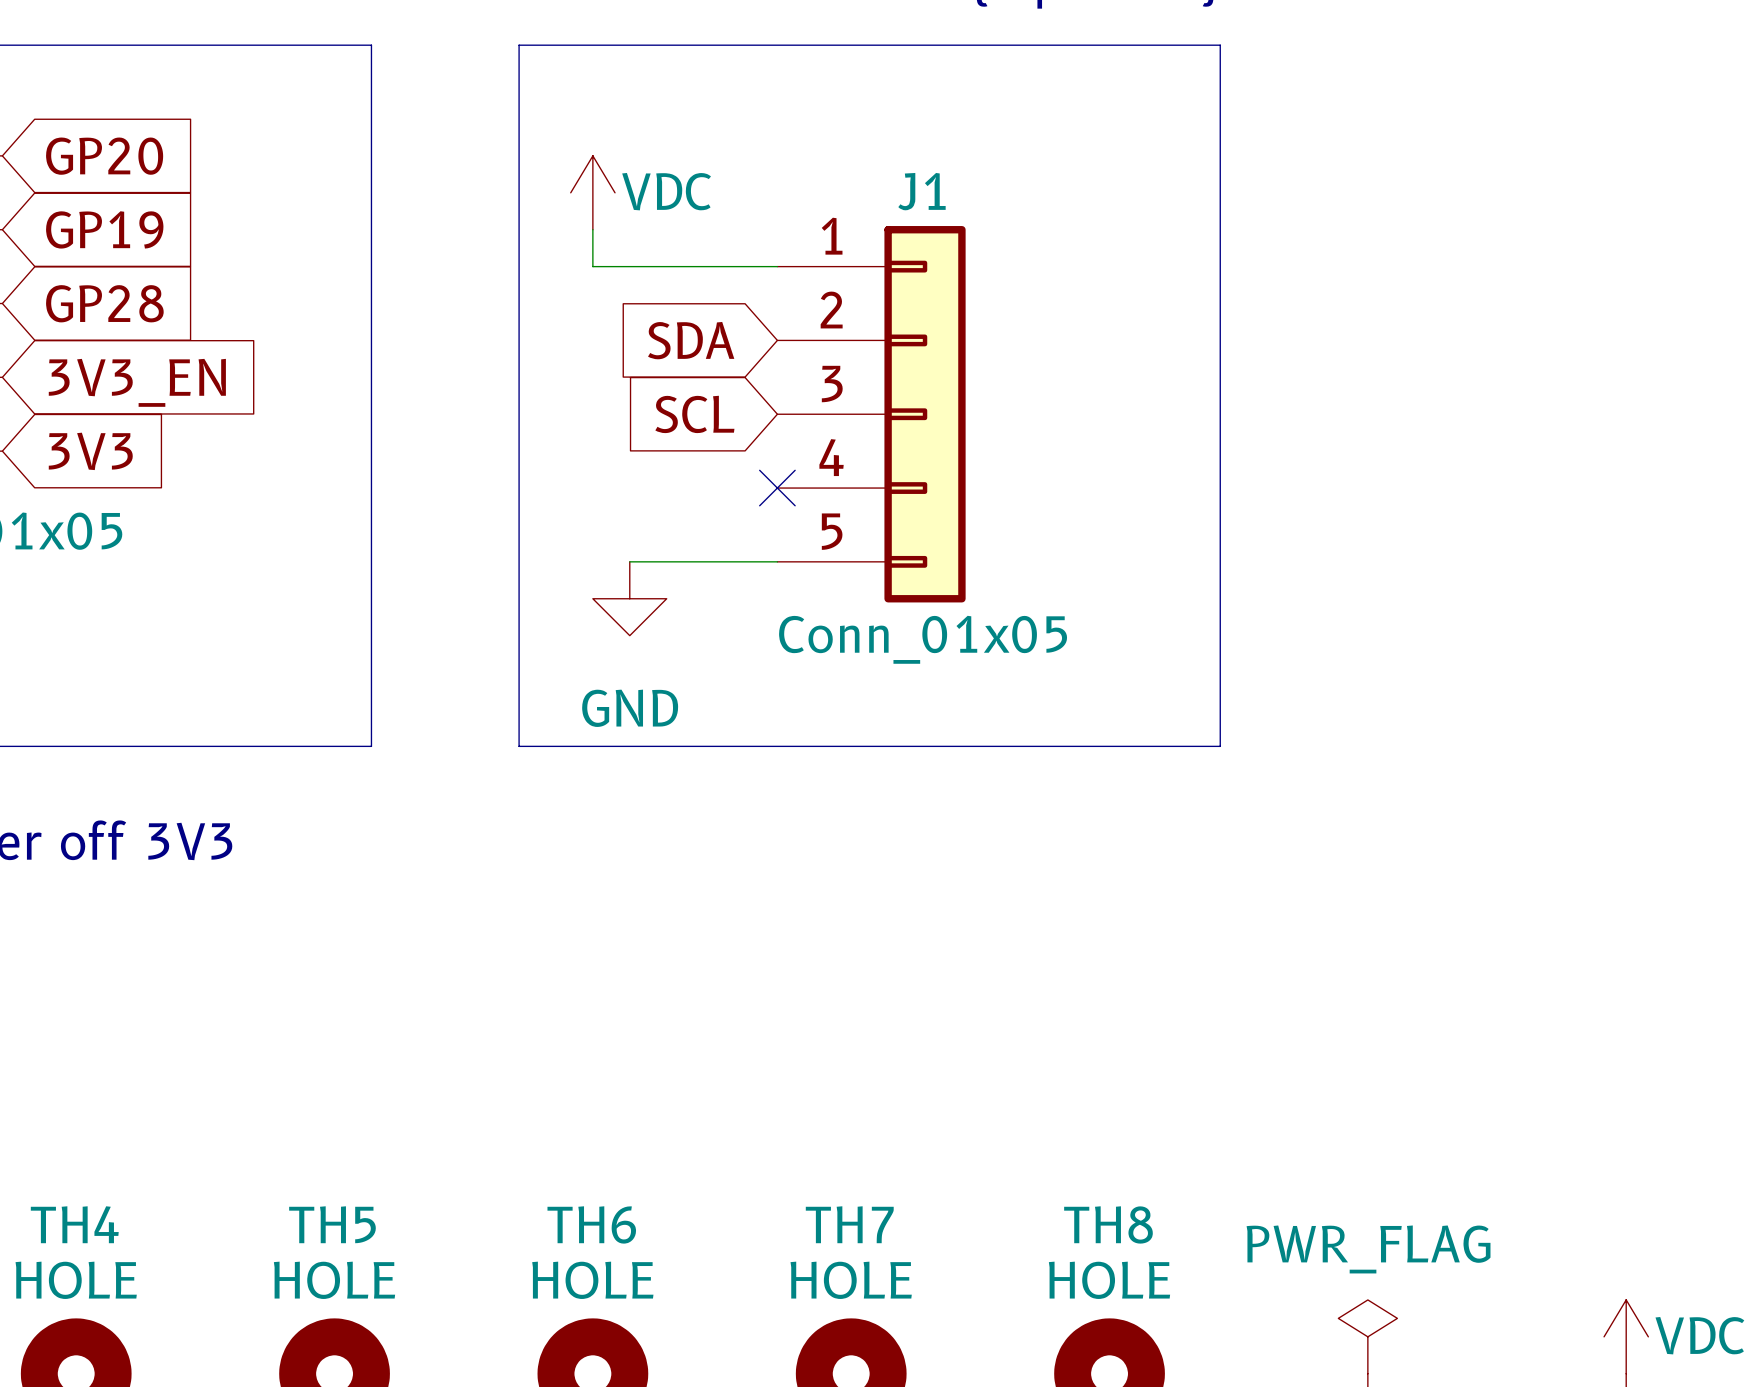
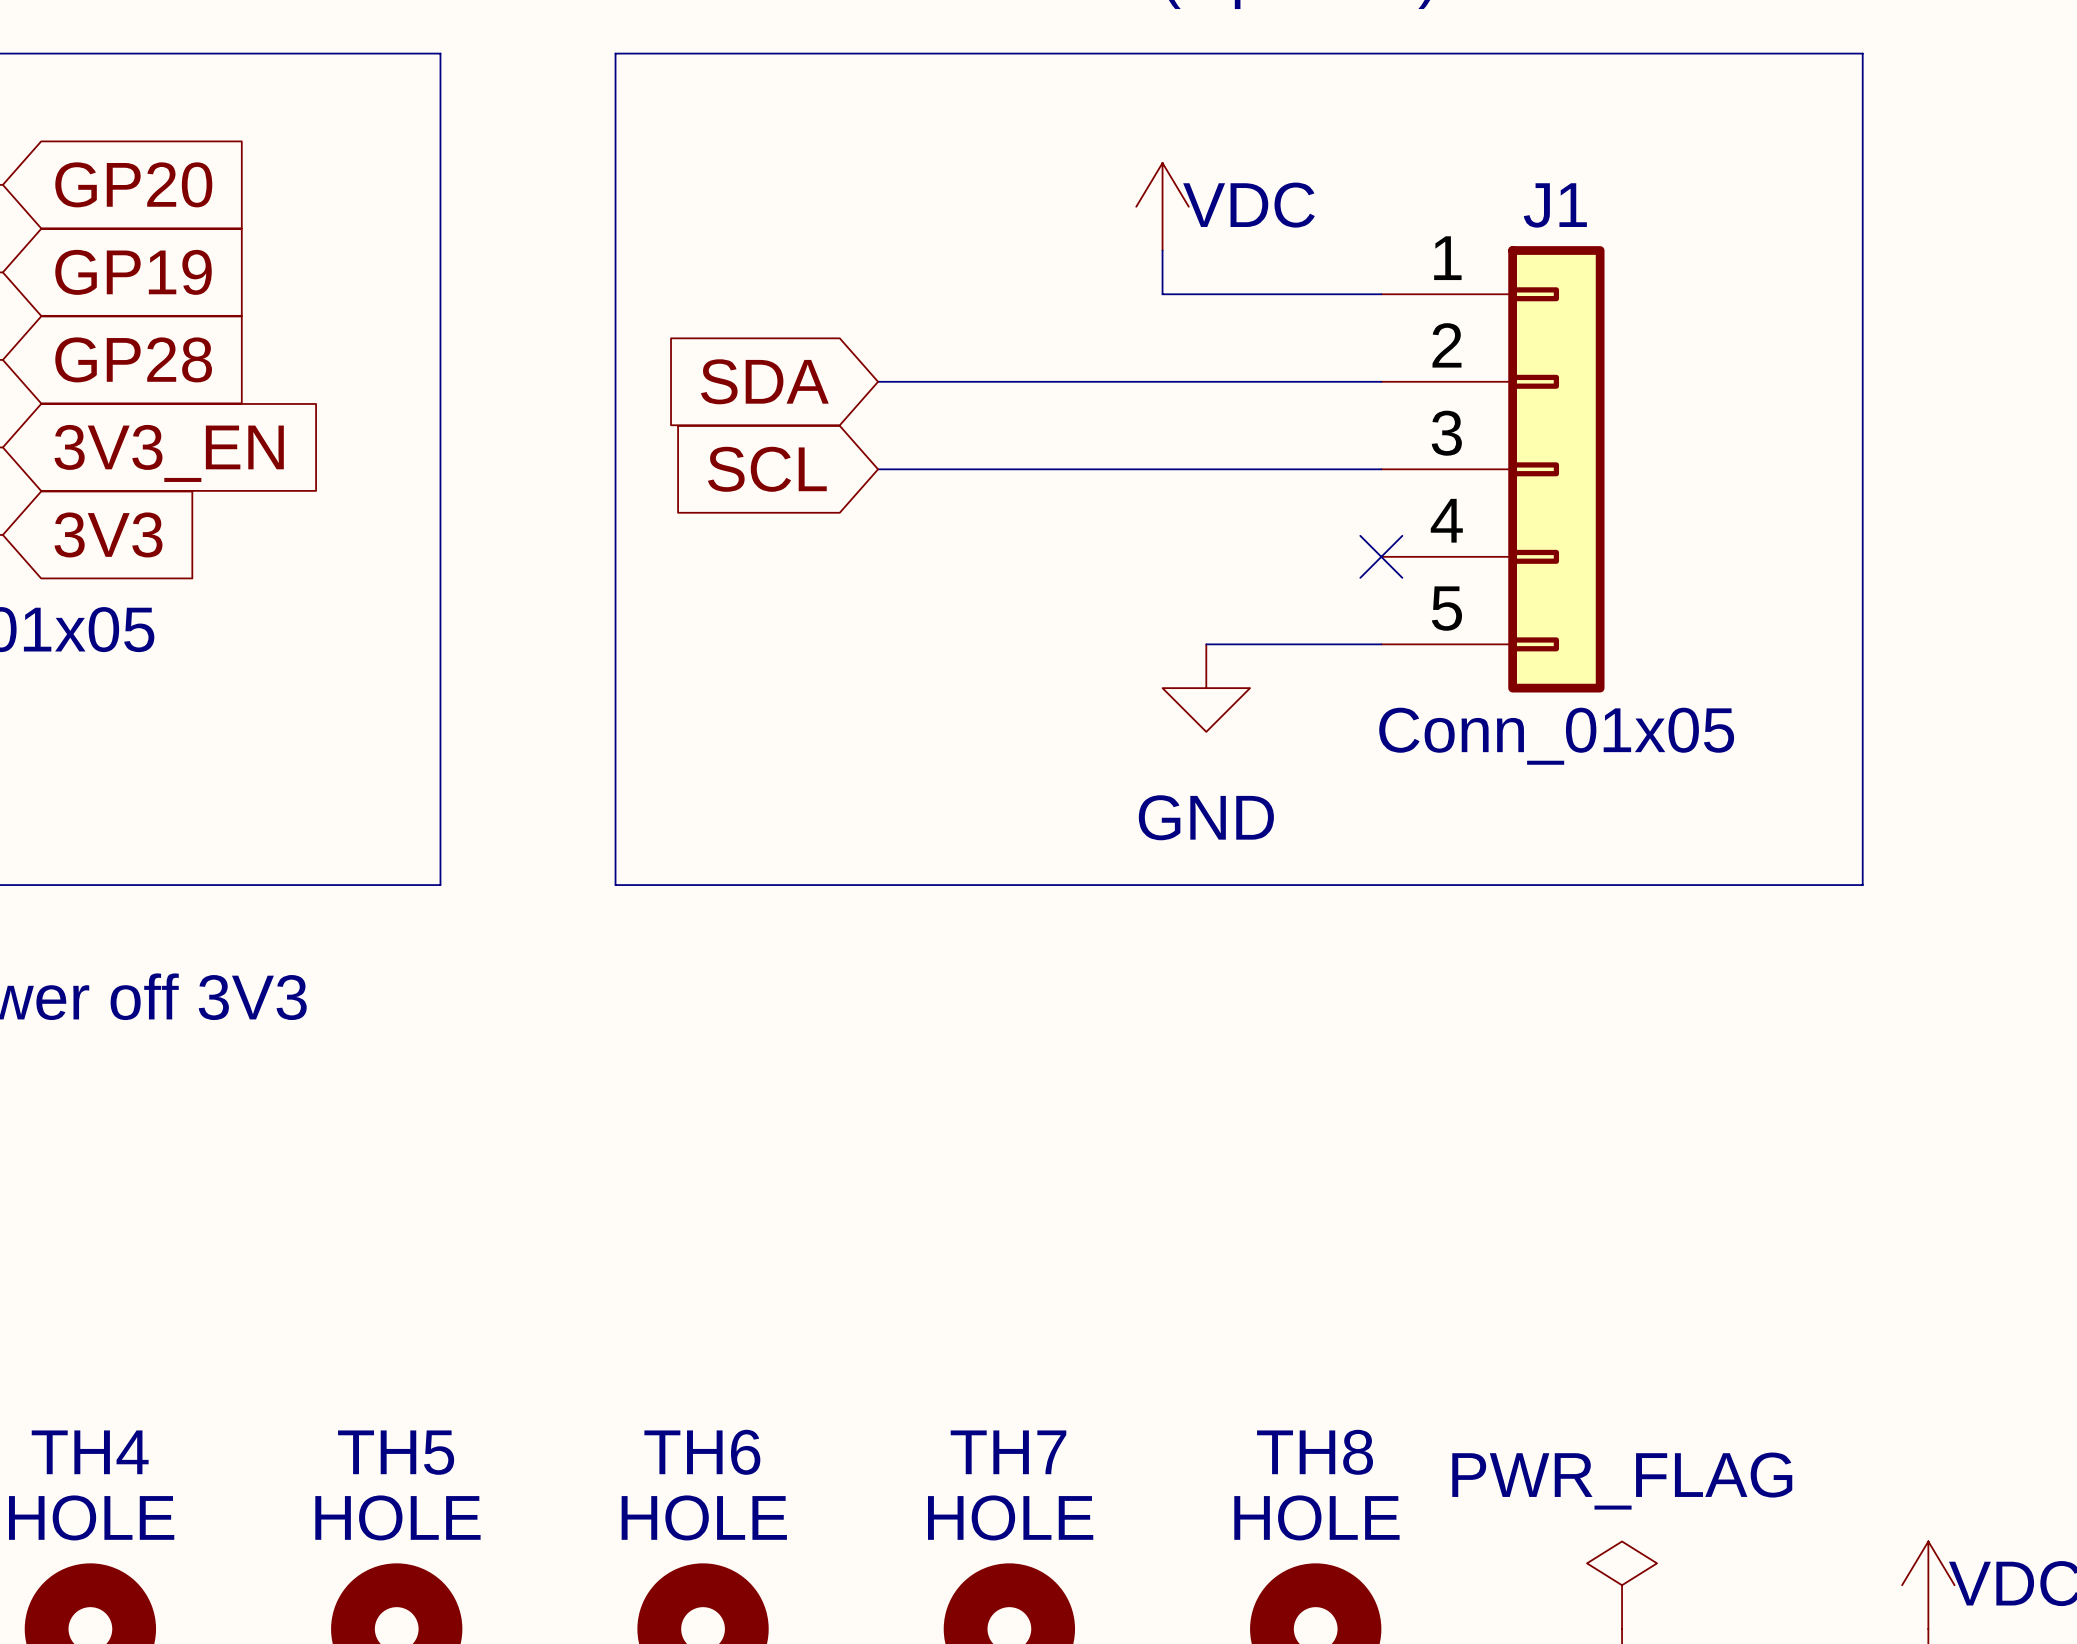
line: (1220, 45) (1220, 746) -> (1446, 53) (1862, 53) (1862, 885) (1446, 885)
power symbol position: VDC (592, 192) -> VDC (1162, 206)
wire: (592, 229) (592, 266) (777, 266) -> (1162, 250) (1162, 294) (1381, 294)
wire: none -> (878, 381) (1381, 381)
global label position: SDA (691, 340) -> SDA (764, 381)
wire: none -> (878, 469) (1381, 469)
global label position: SCL (694, 414) -> SCL (767, 469)
J1 position: (871, 414) -> (1492, 469)
no-connect mark: none -> (1381, 556)
no-connect mark: (777, 488) -> none
wire: (629, 561) (777, 561) -> (1206, 644) (1381, 644)
power symbol position: GND (629, 598) -> GND (1206, 688)

